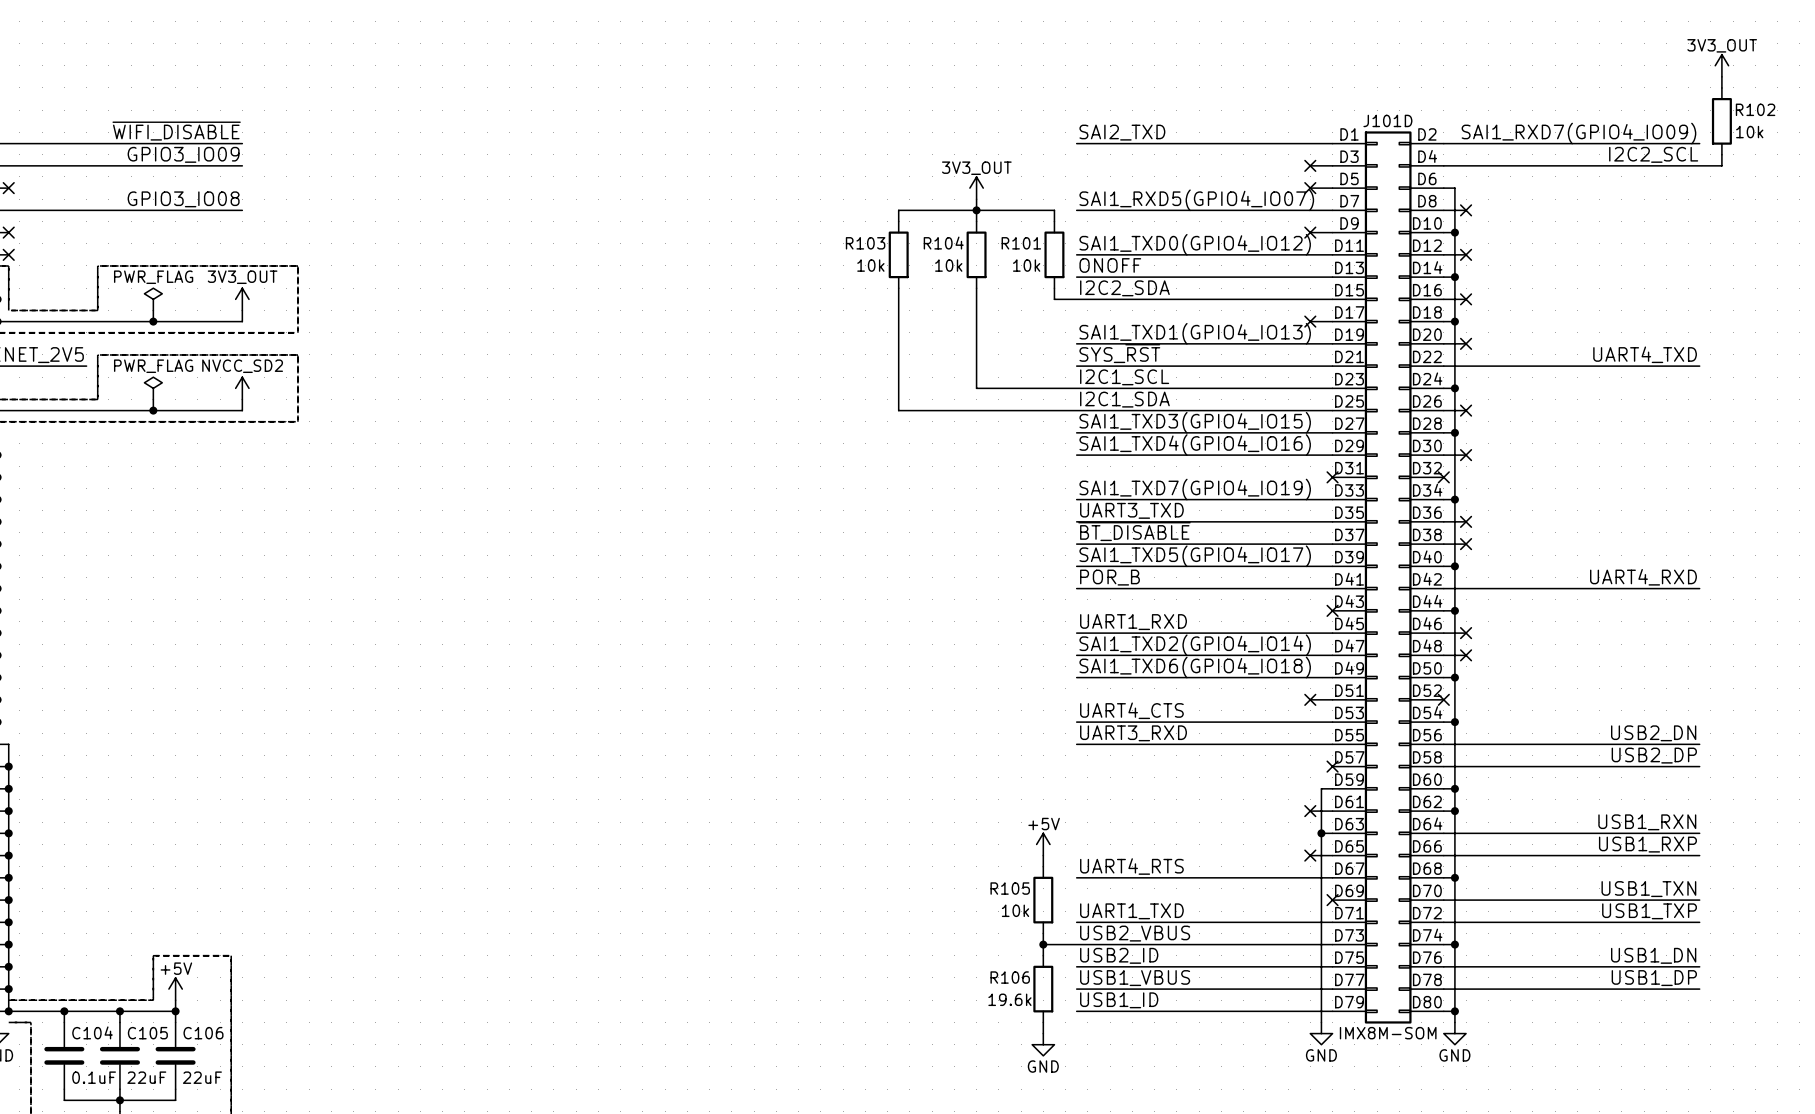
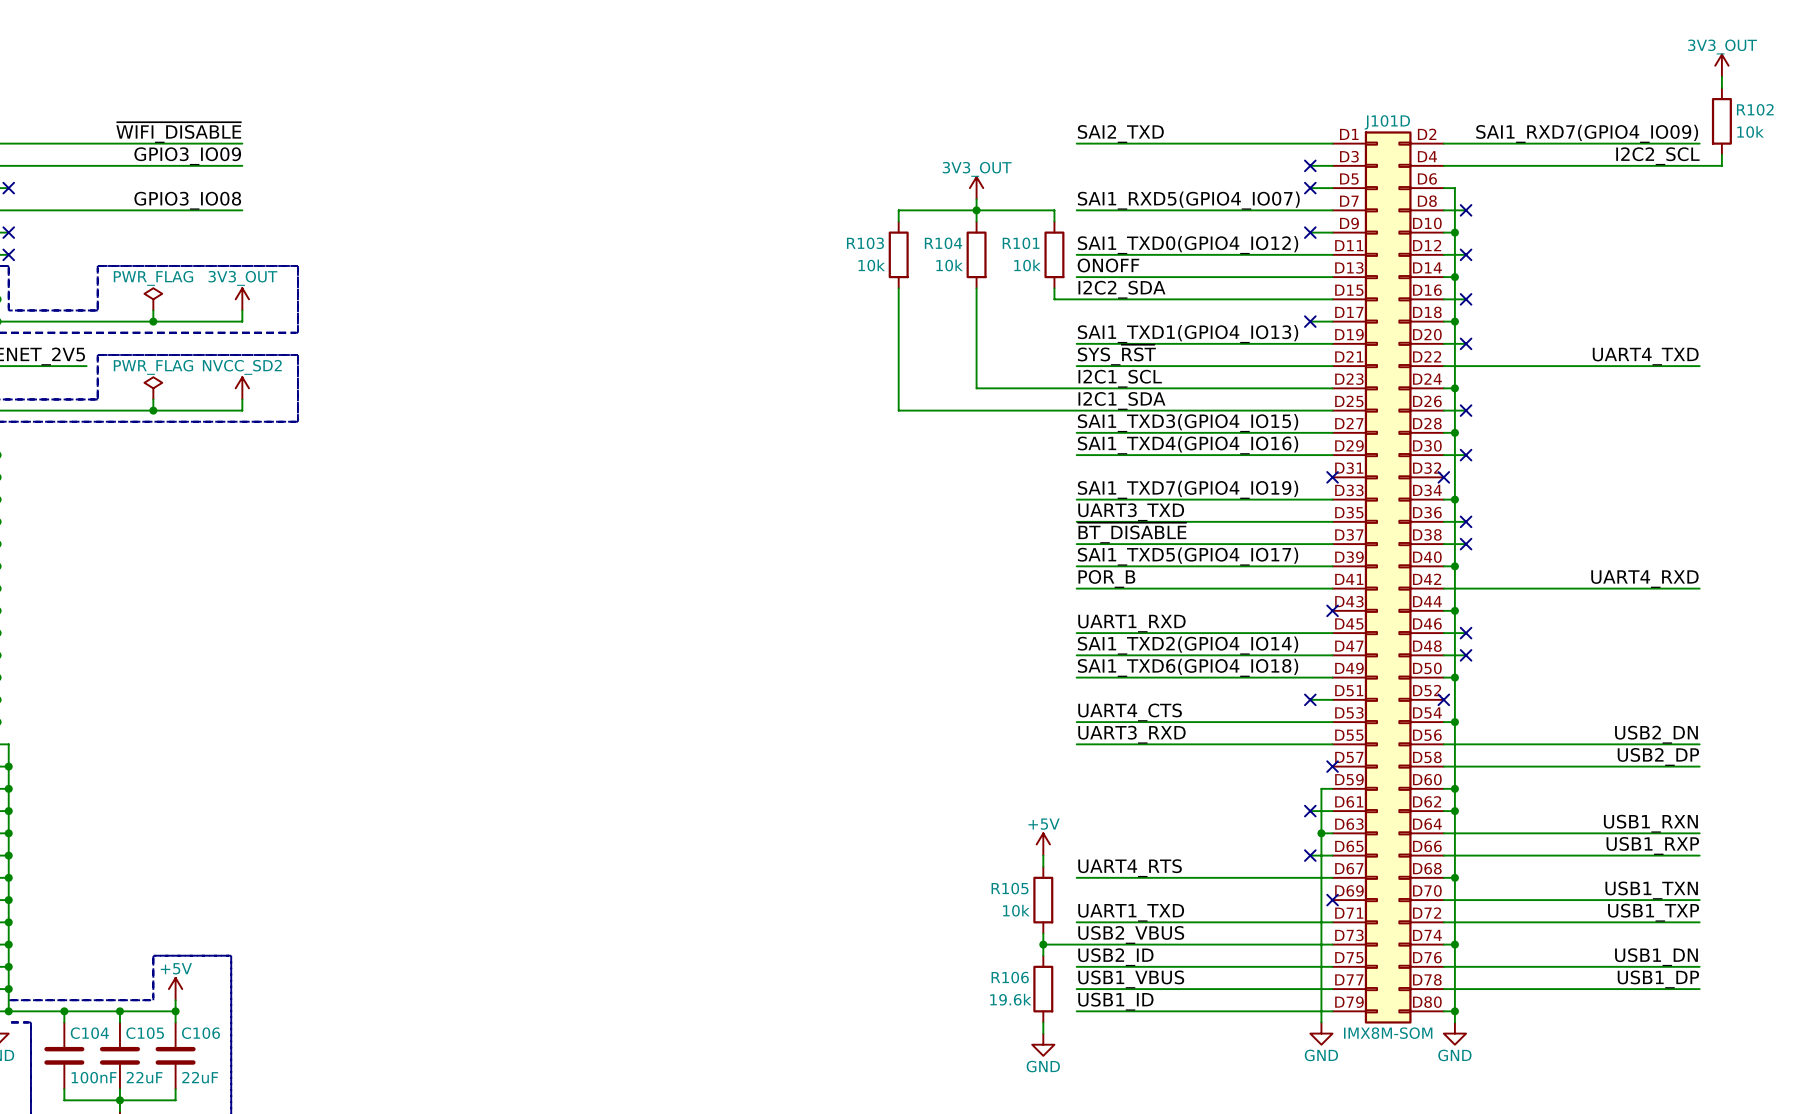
C104 value: 0.1uF (94, 1077) -> 100nF (94, 1077)

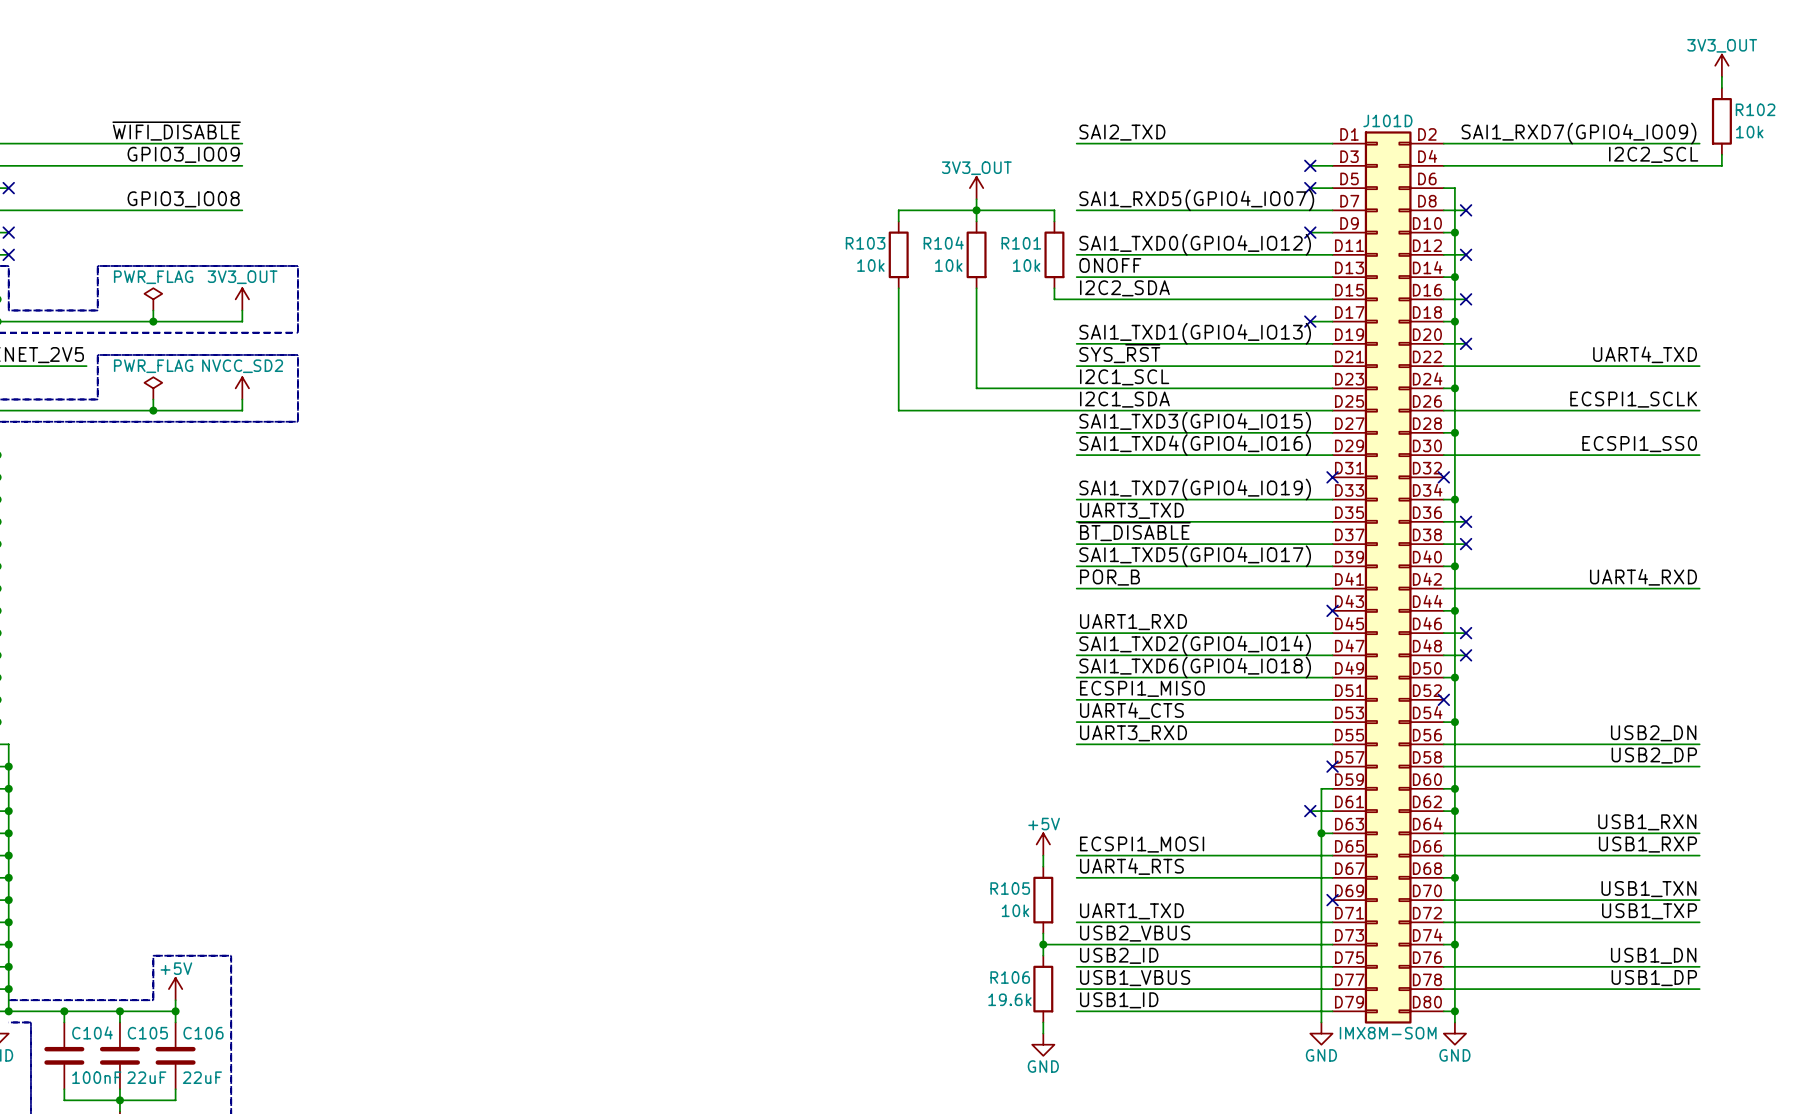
label: none -> ECSPI1_SCLK (1633, 399)
wire: none -> (1466, 410) (1699, 410)
no-connect mark: (1466, 410) -> none
label: none -> ECSPI1_SS0 (1639, 444)
wire: none -> (1466, 455) (1699, 455)
no-connect mark: (1466, 455) -> none
label: none -> ECSPI1_MISO (1142, 688)
wire: none -> (1076, 699) (1310, 699)
no-connect mark: (1310, 699) -> none
label: none -> ECSPI1_MOSI (1142, 844)
wire: none -> (1076, 855) (1310, 855)
no-connect mark: (1310, 855) -> none

